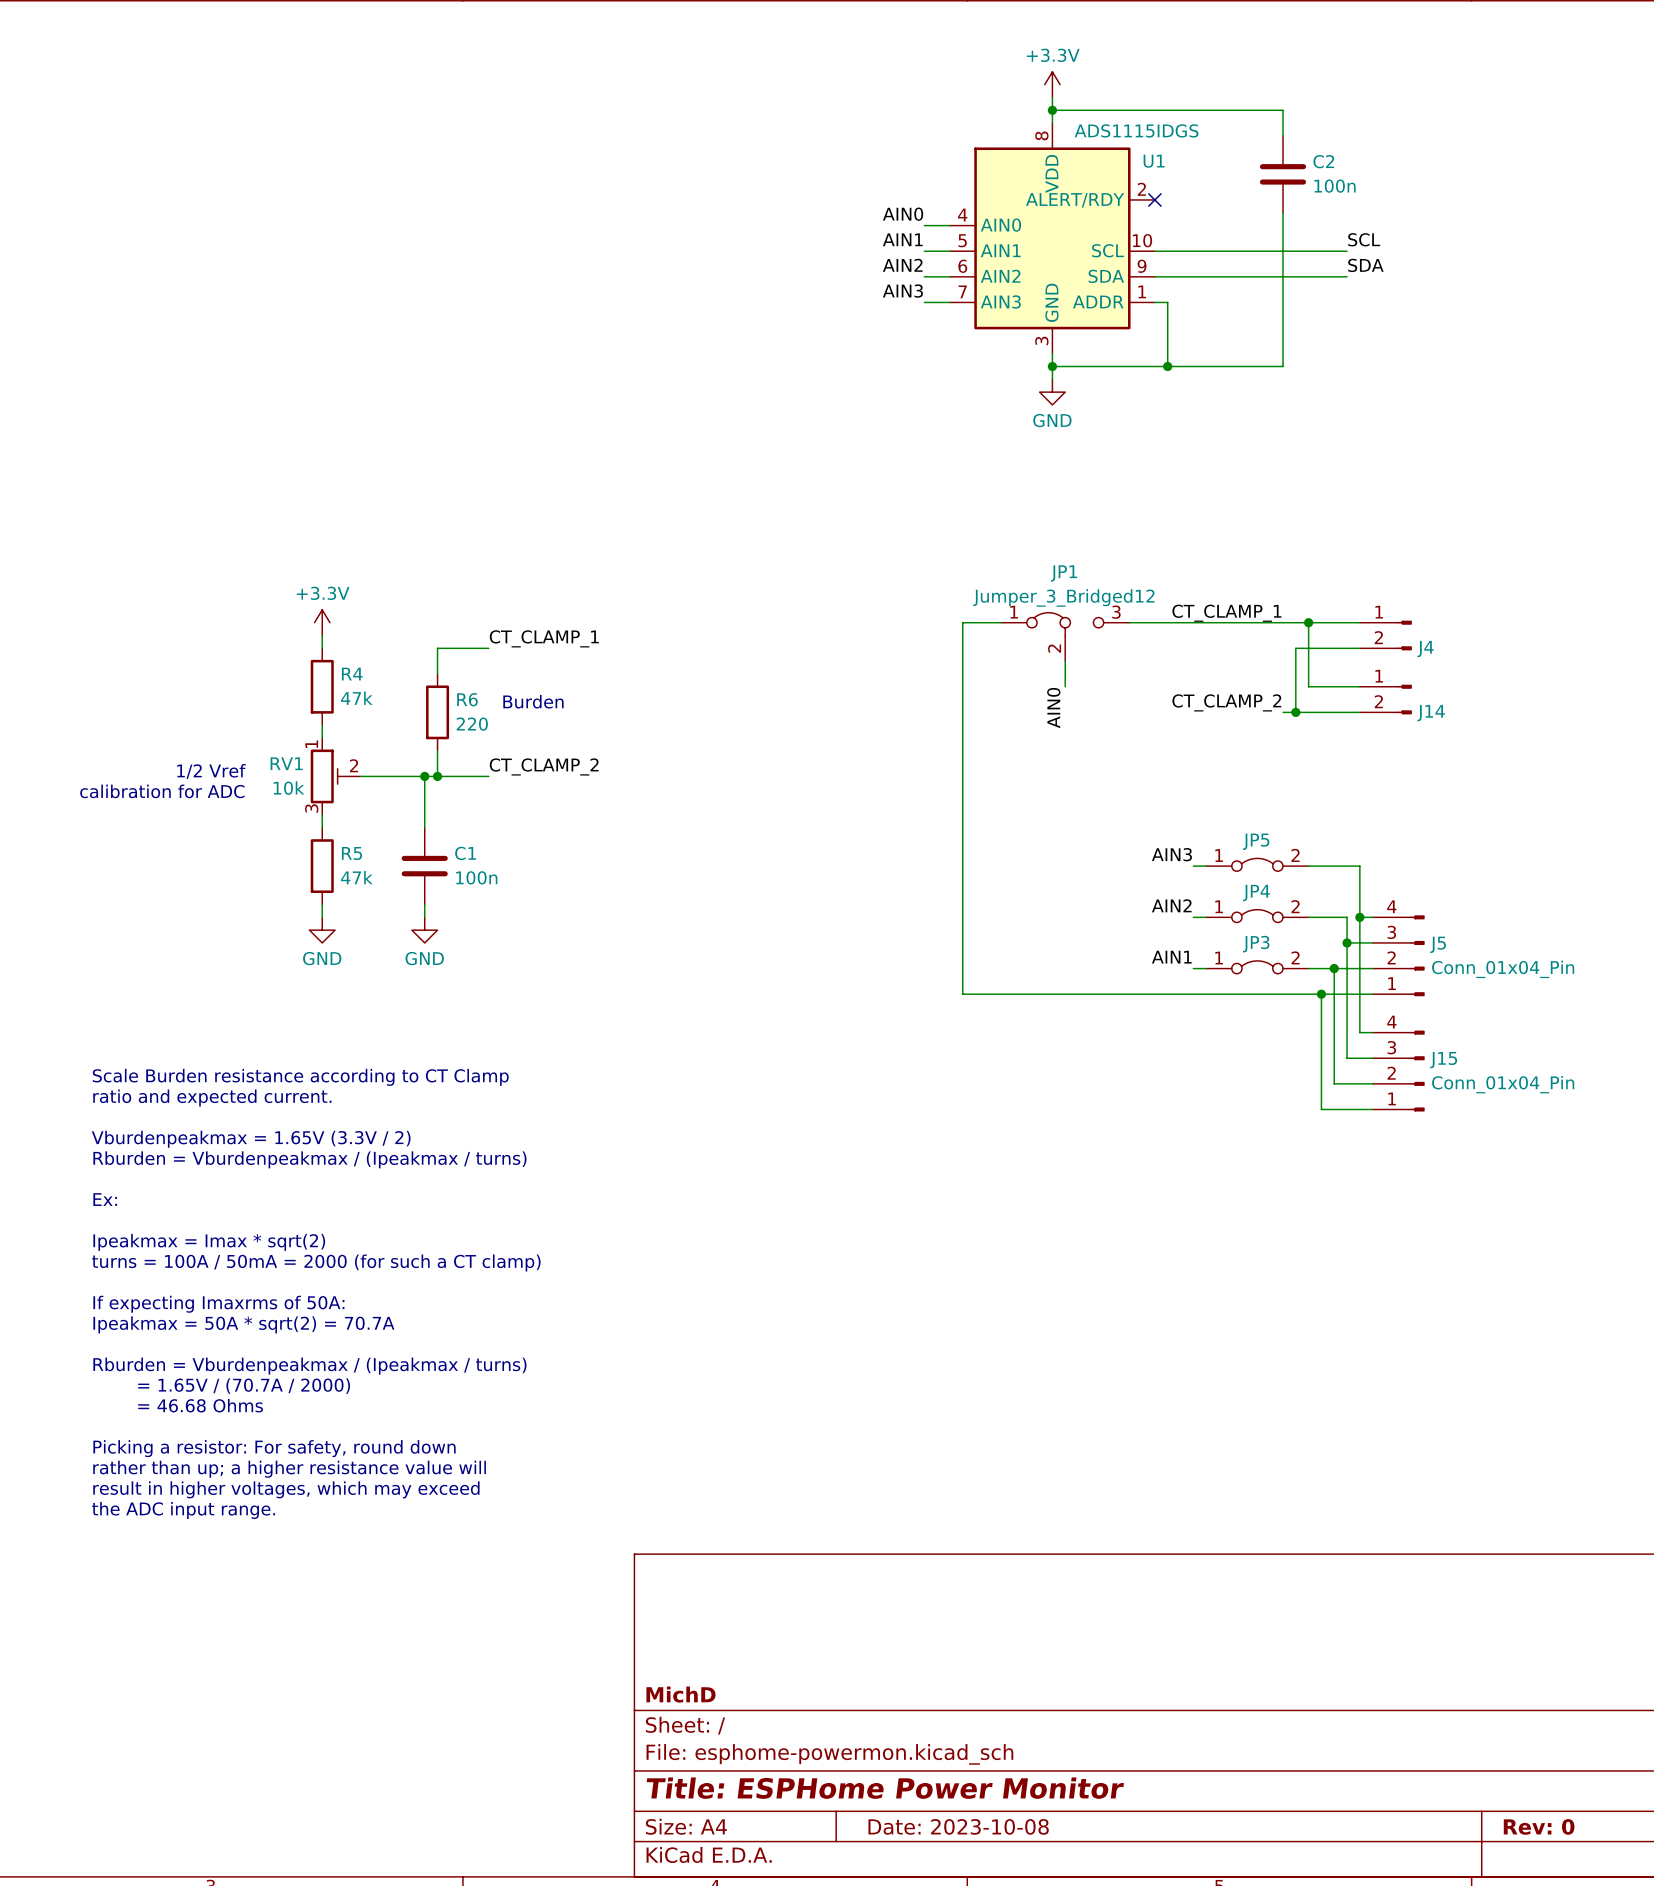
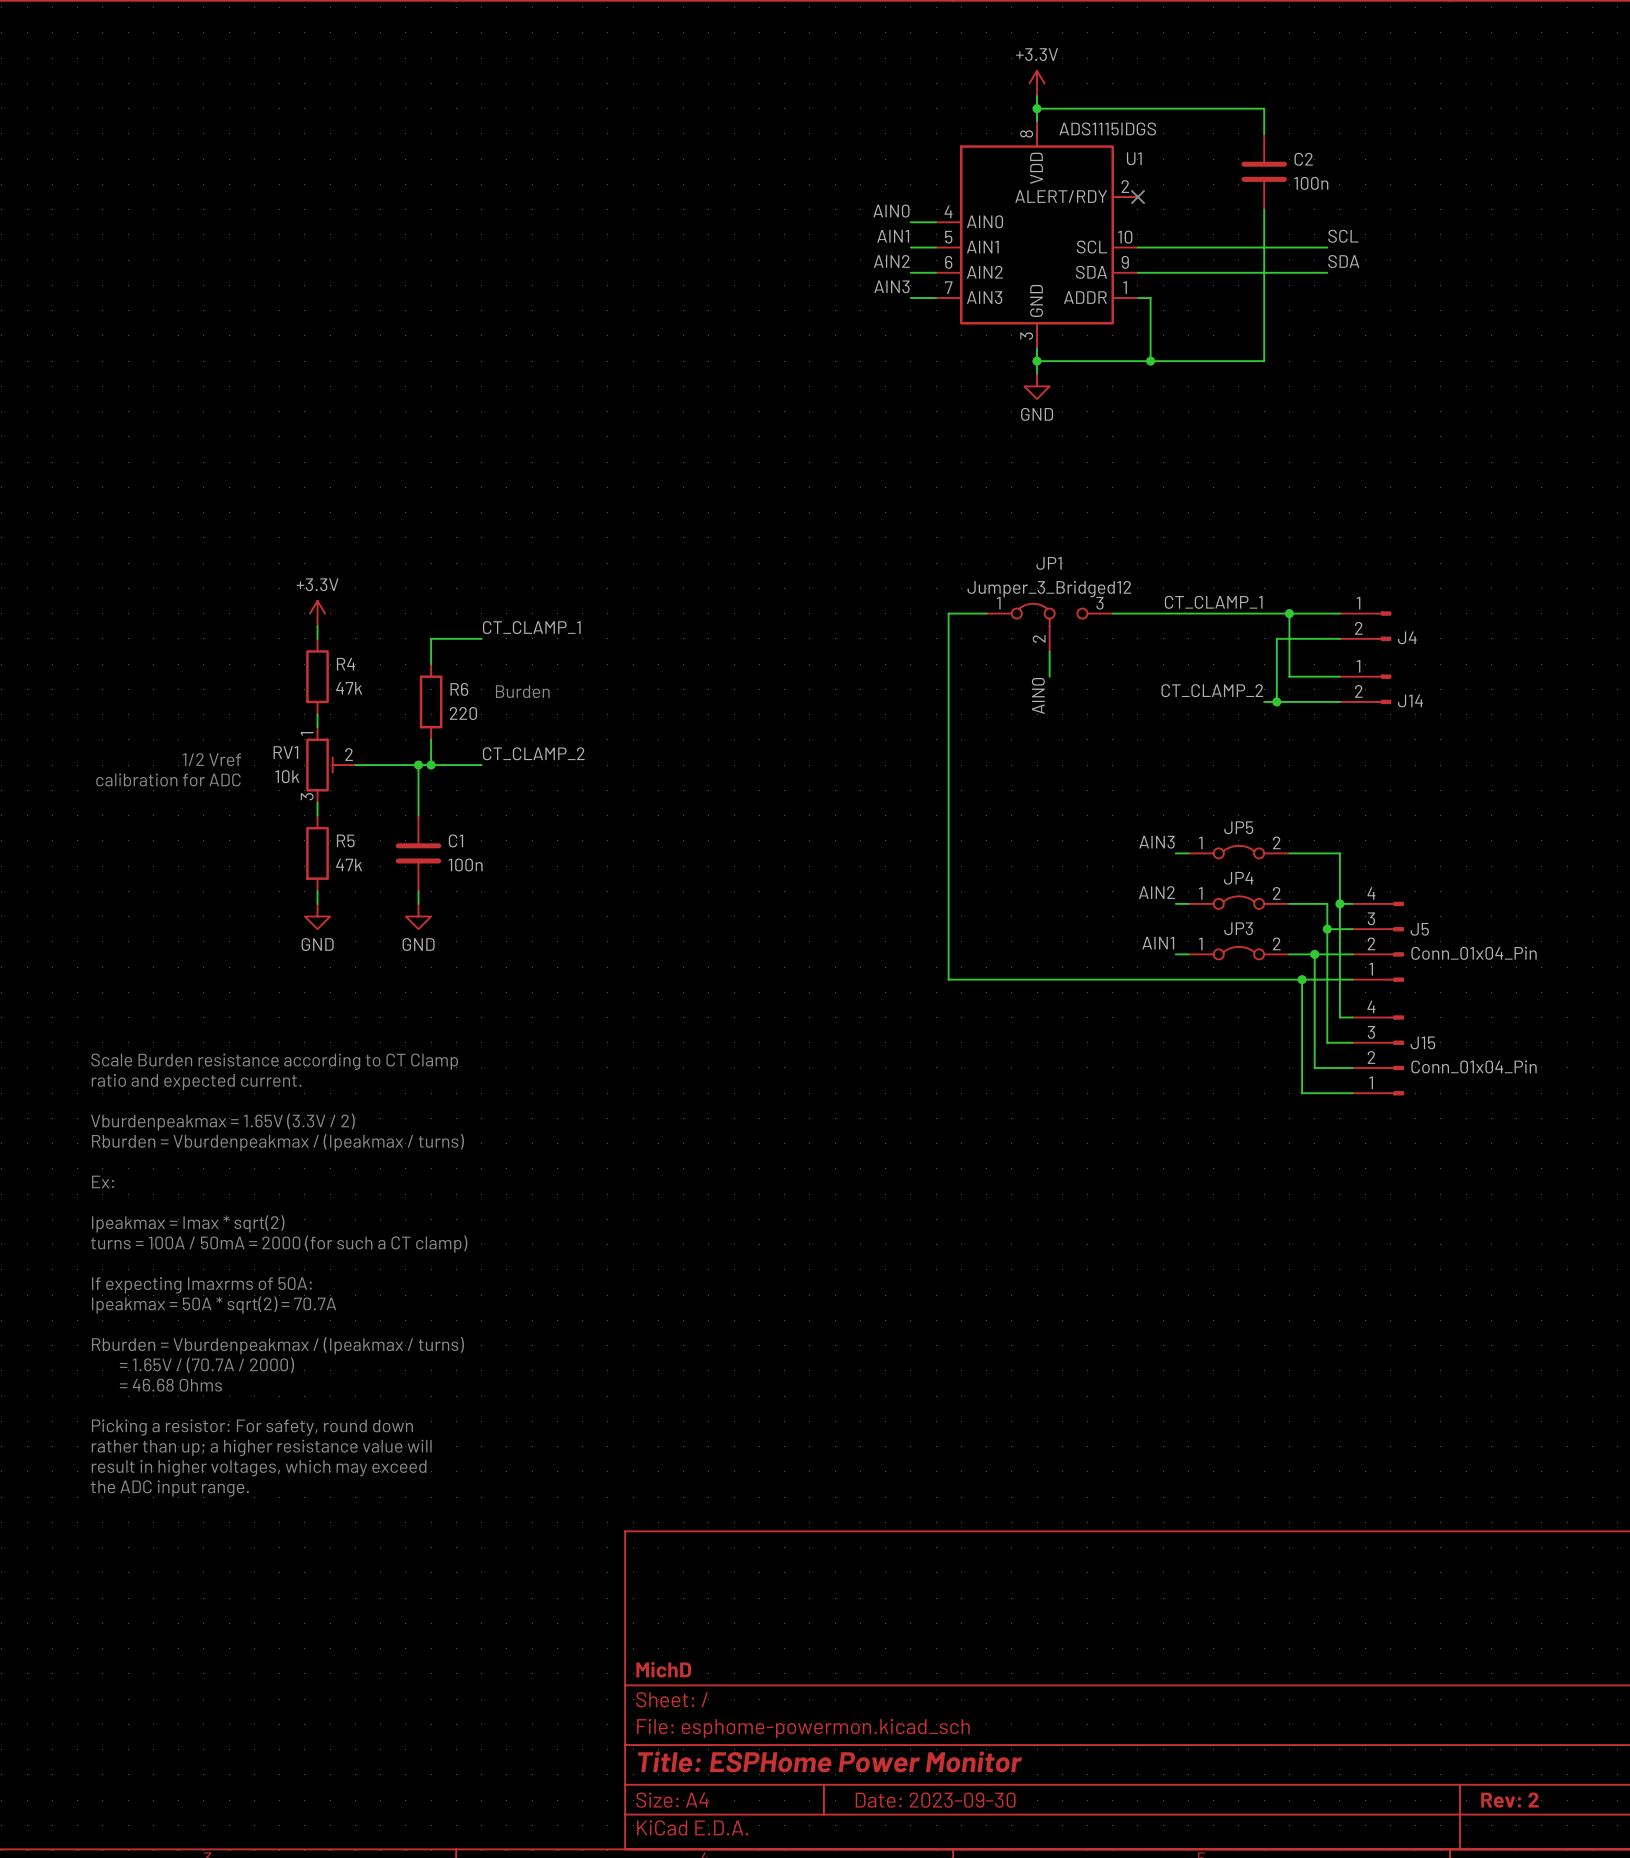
title block: Date: 2023-10-08 (958, 1826) -> Date: 2023-09-30 (935, 1800)
title block: Rev: 0 (1539, 1826) -> Rev: 2 (1509, 1800)

